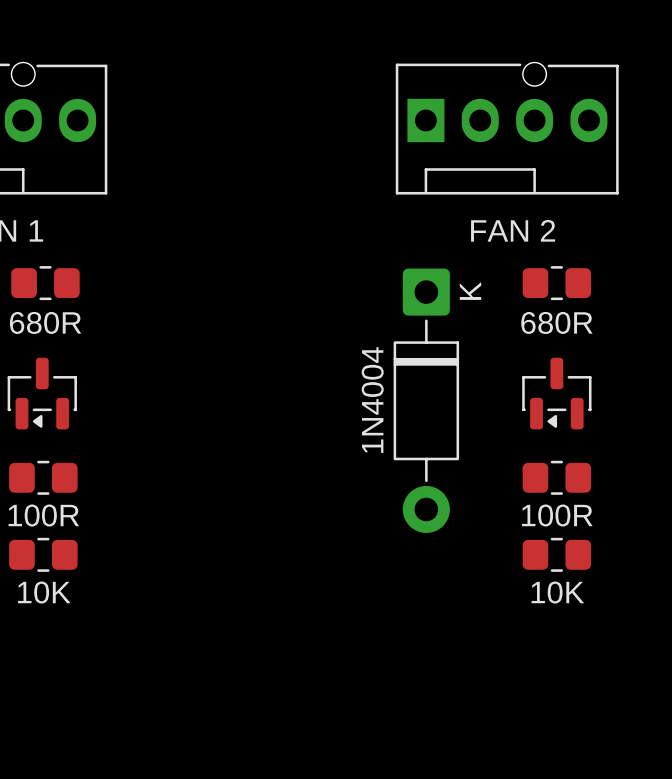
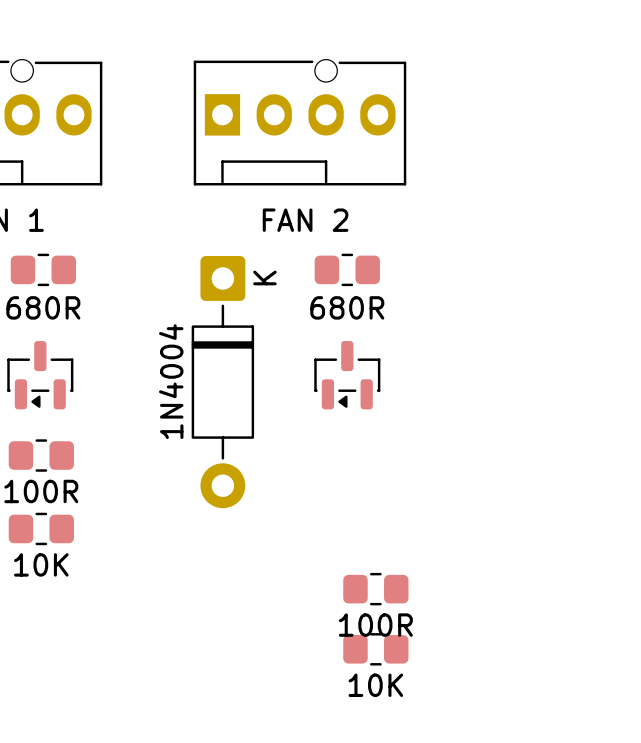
part position: (507, 128) -> (299, 122)
part position: (556, 283) -> (347, 269)
part position: (556, 393) -> (347, 375)
part position: (426, 400) -> (222, 382)
part position: (556, 477) -> (375, 589)
part position: (556, 554) -> (375, 649)

